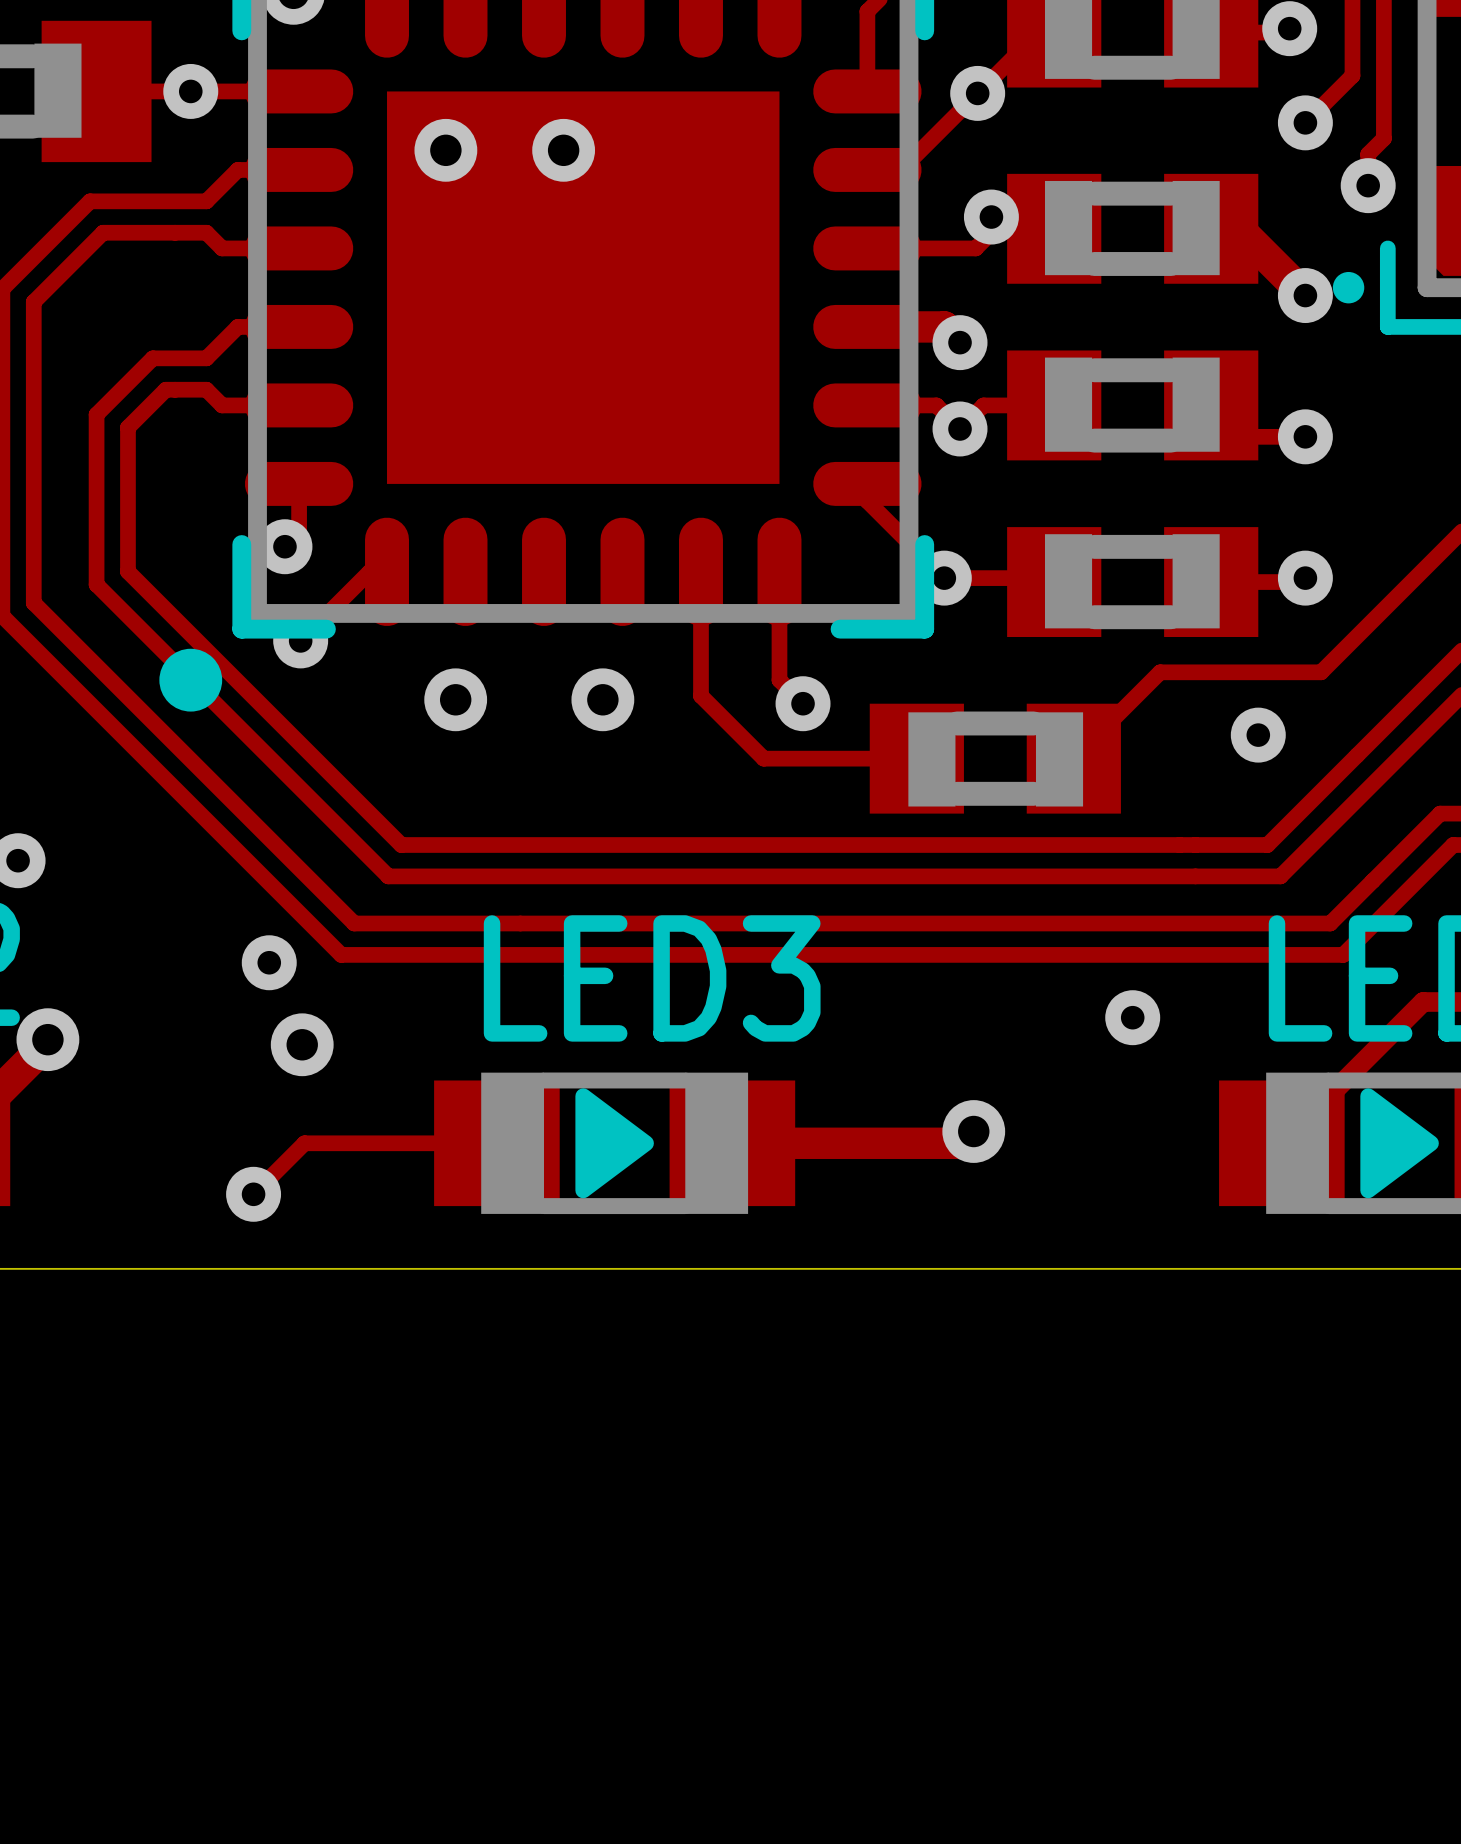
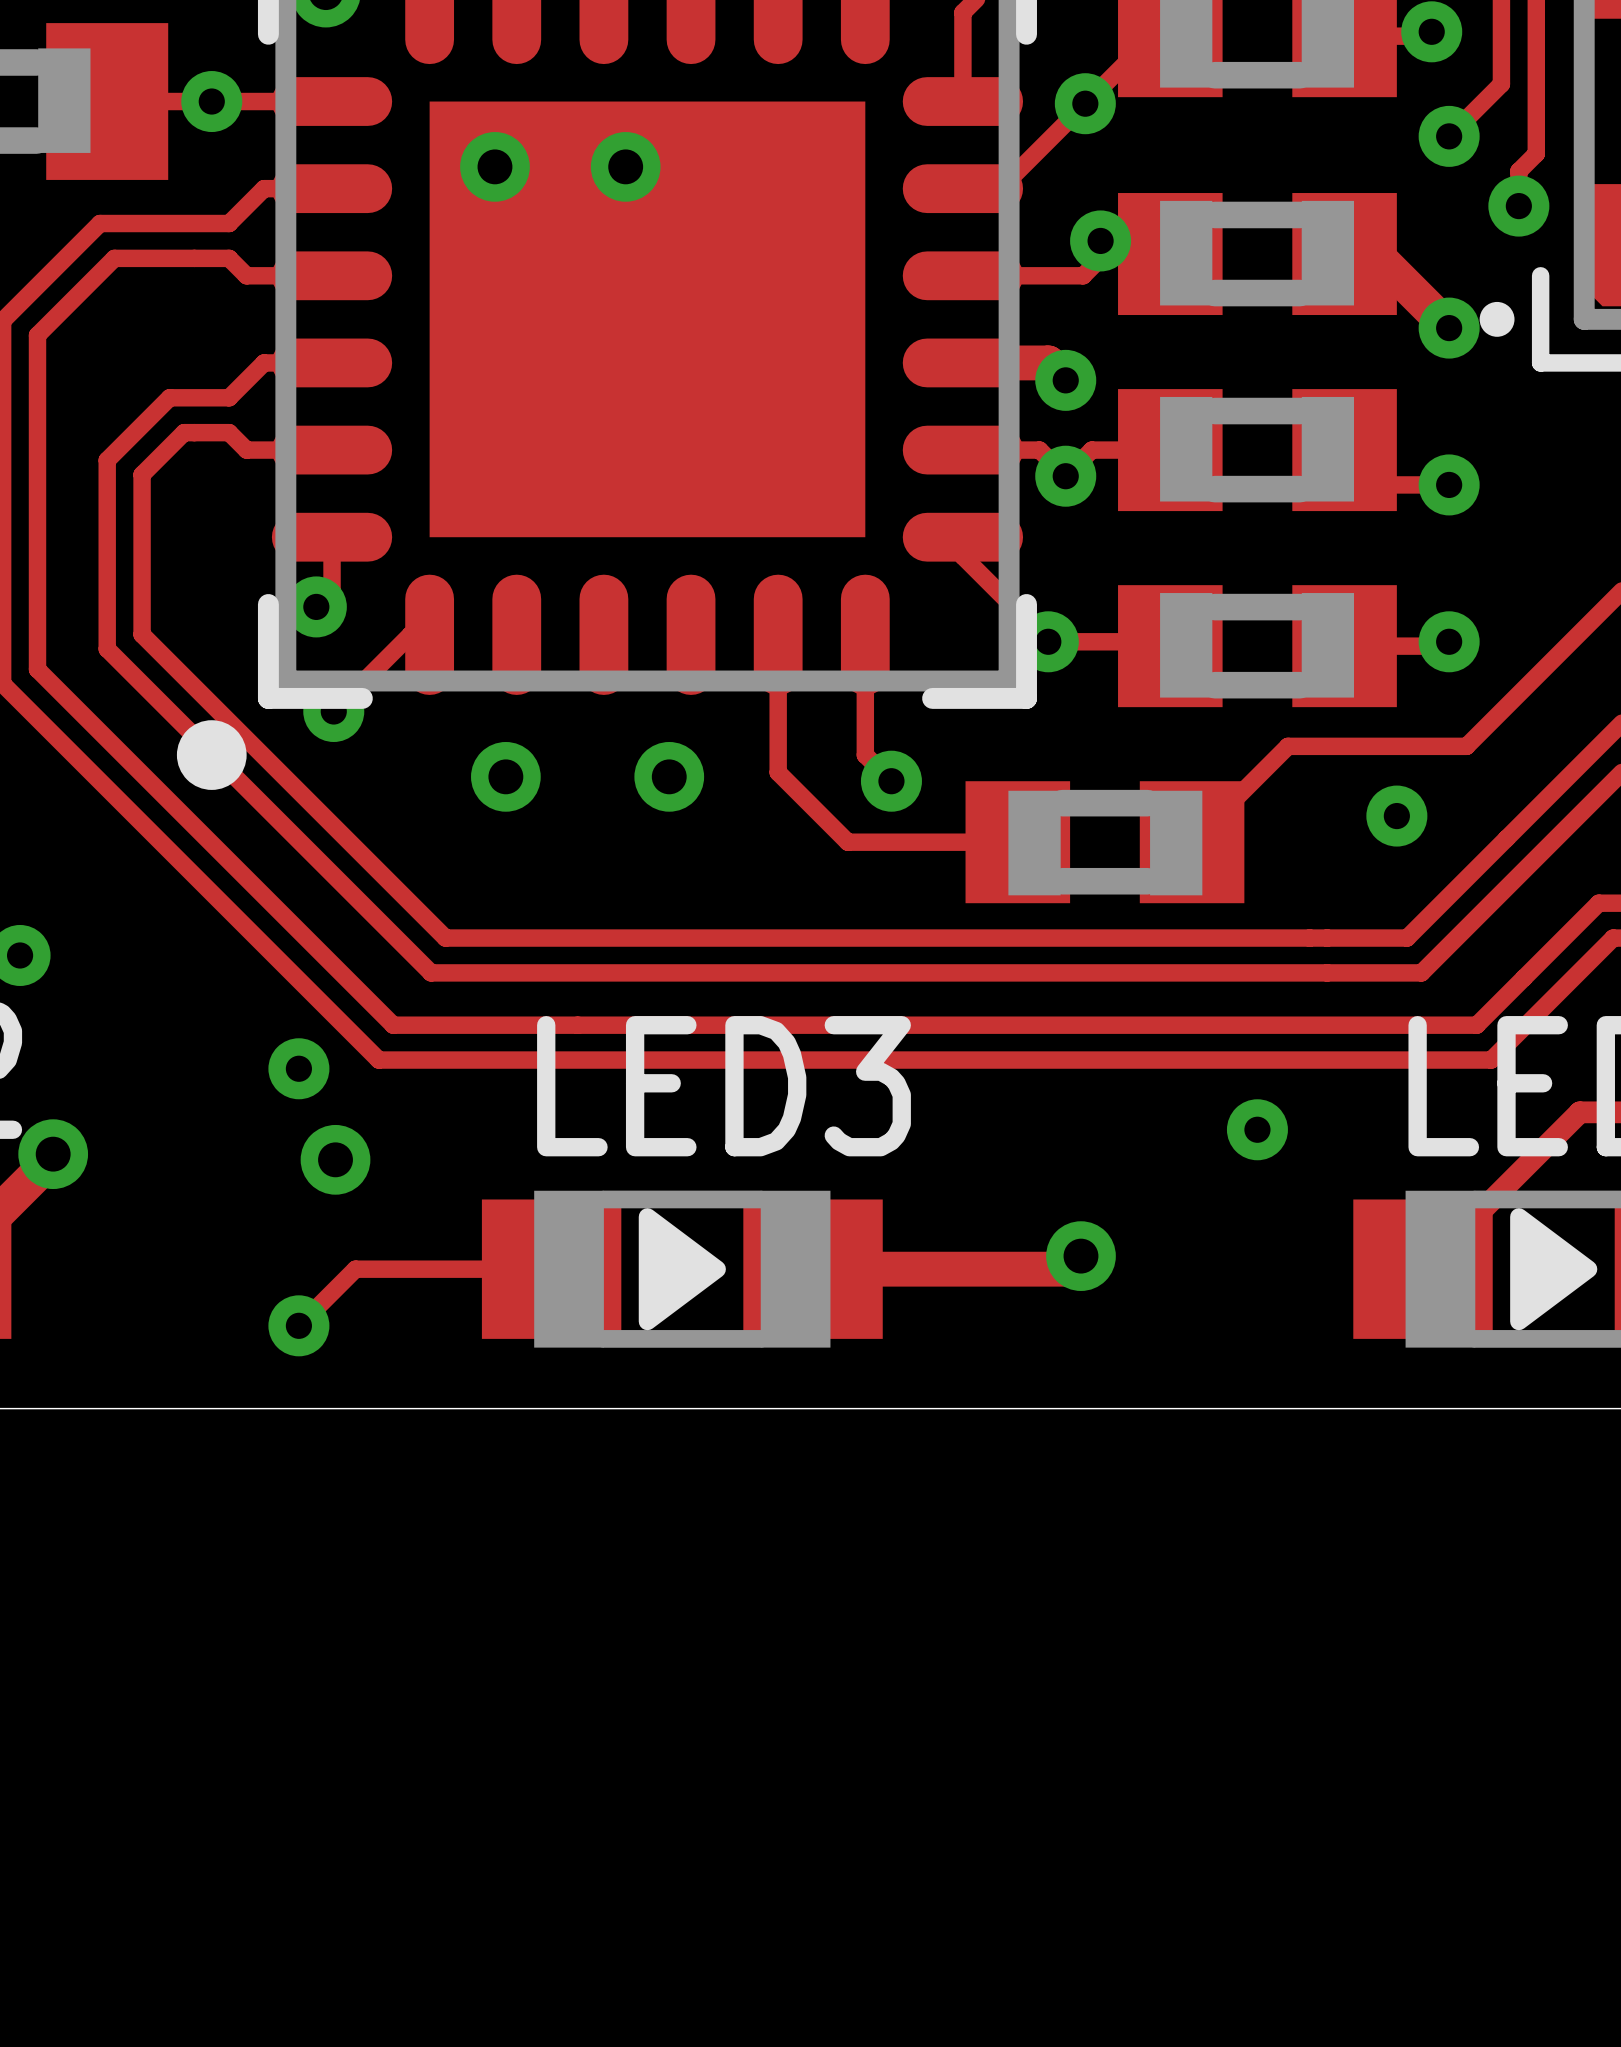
track: (320, 1143) (304, 1143) (253, 1194) -> (355, 1269) (298, 1325)
via position: (253, 1194) -> (298, 1325)

